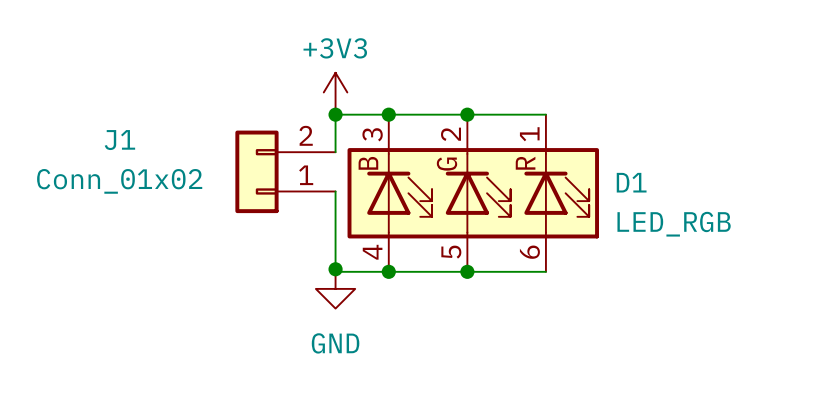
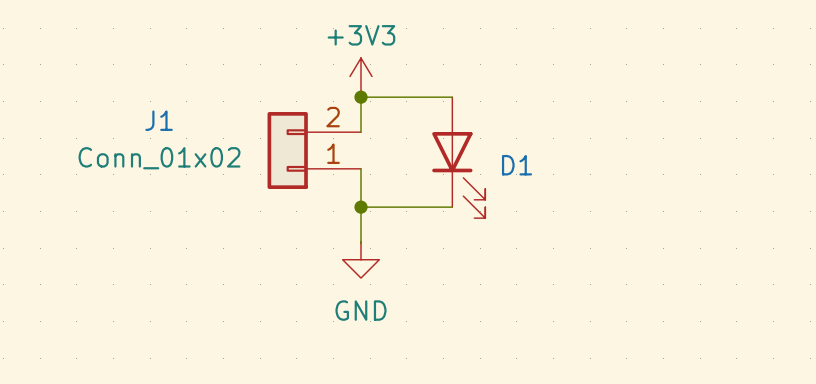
D1 symbol: [347, 114, 600, 272] -> [432, 97, 486, 219]
junction: (388, 114) -> none
wire: (433, 114) (545, 114) -> none
junction: (467, 114) -> none
D1 name position: D1 (631, 182) -> D1 (517, 165)
D1 value: LED_RGB (674, 224) -> none
junction: none -> (360, 207)
junction: (335, 269) -> none
wire: (335, 271) (545, 271) -> none
junction: (388, 271) -> none
junction: (467, 271) -> none

